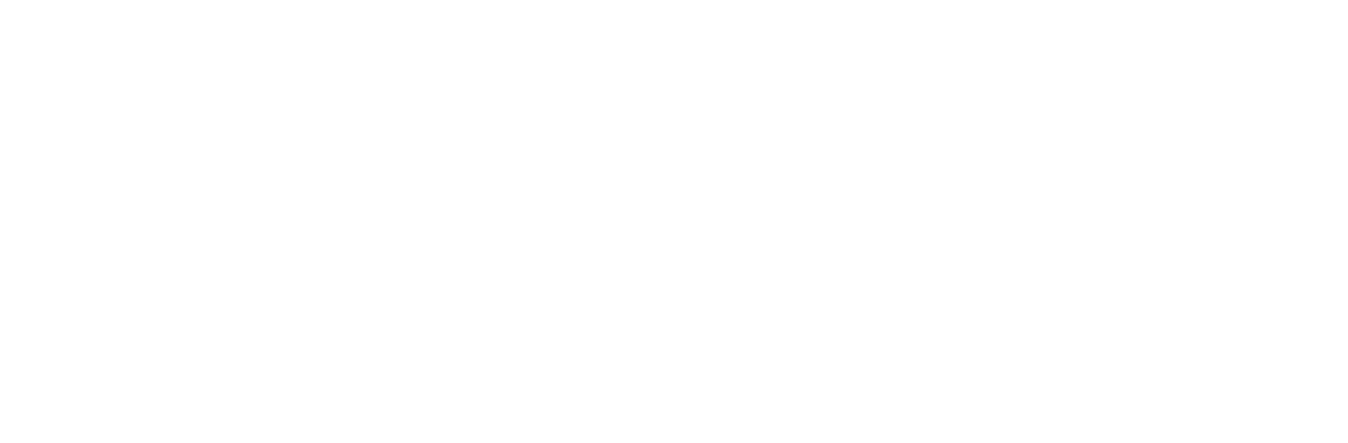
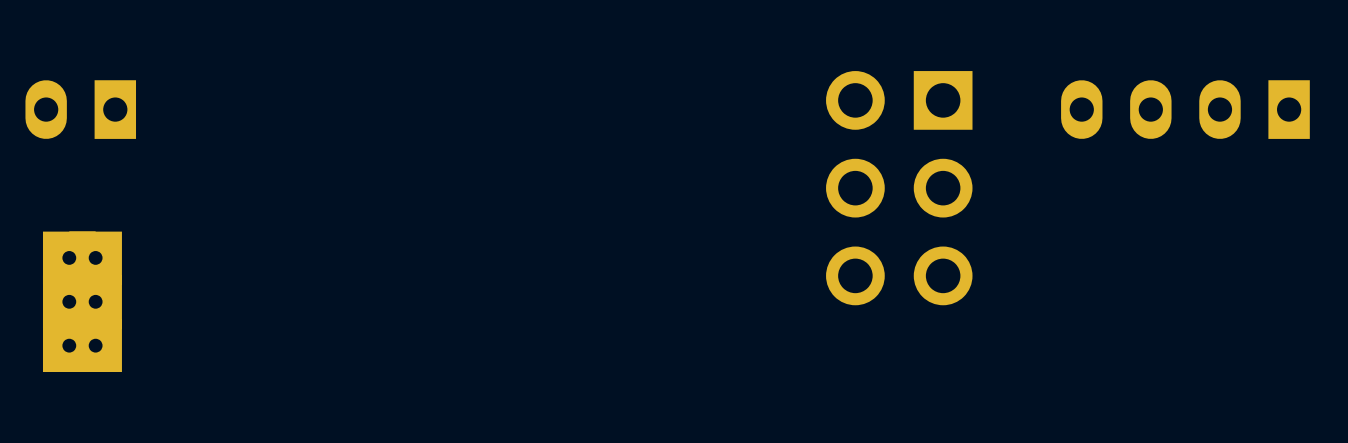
part: none -> (80, 109)
part: none -> (1185, 109)
part: none -> (899, 188)
part: none -> (82, 301)

